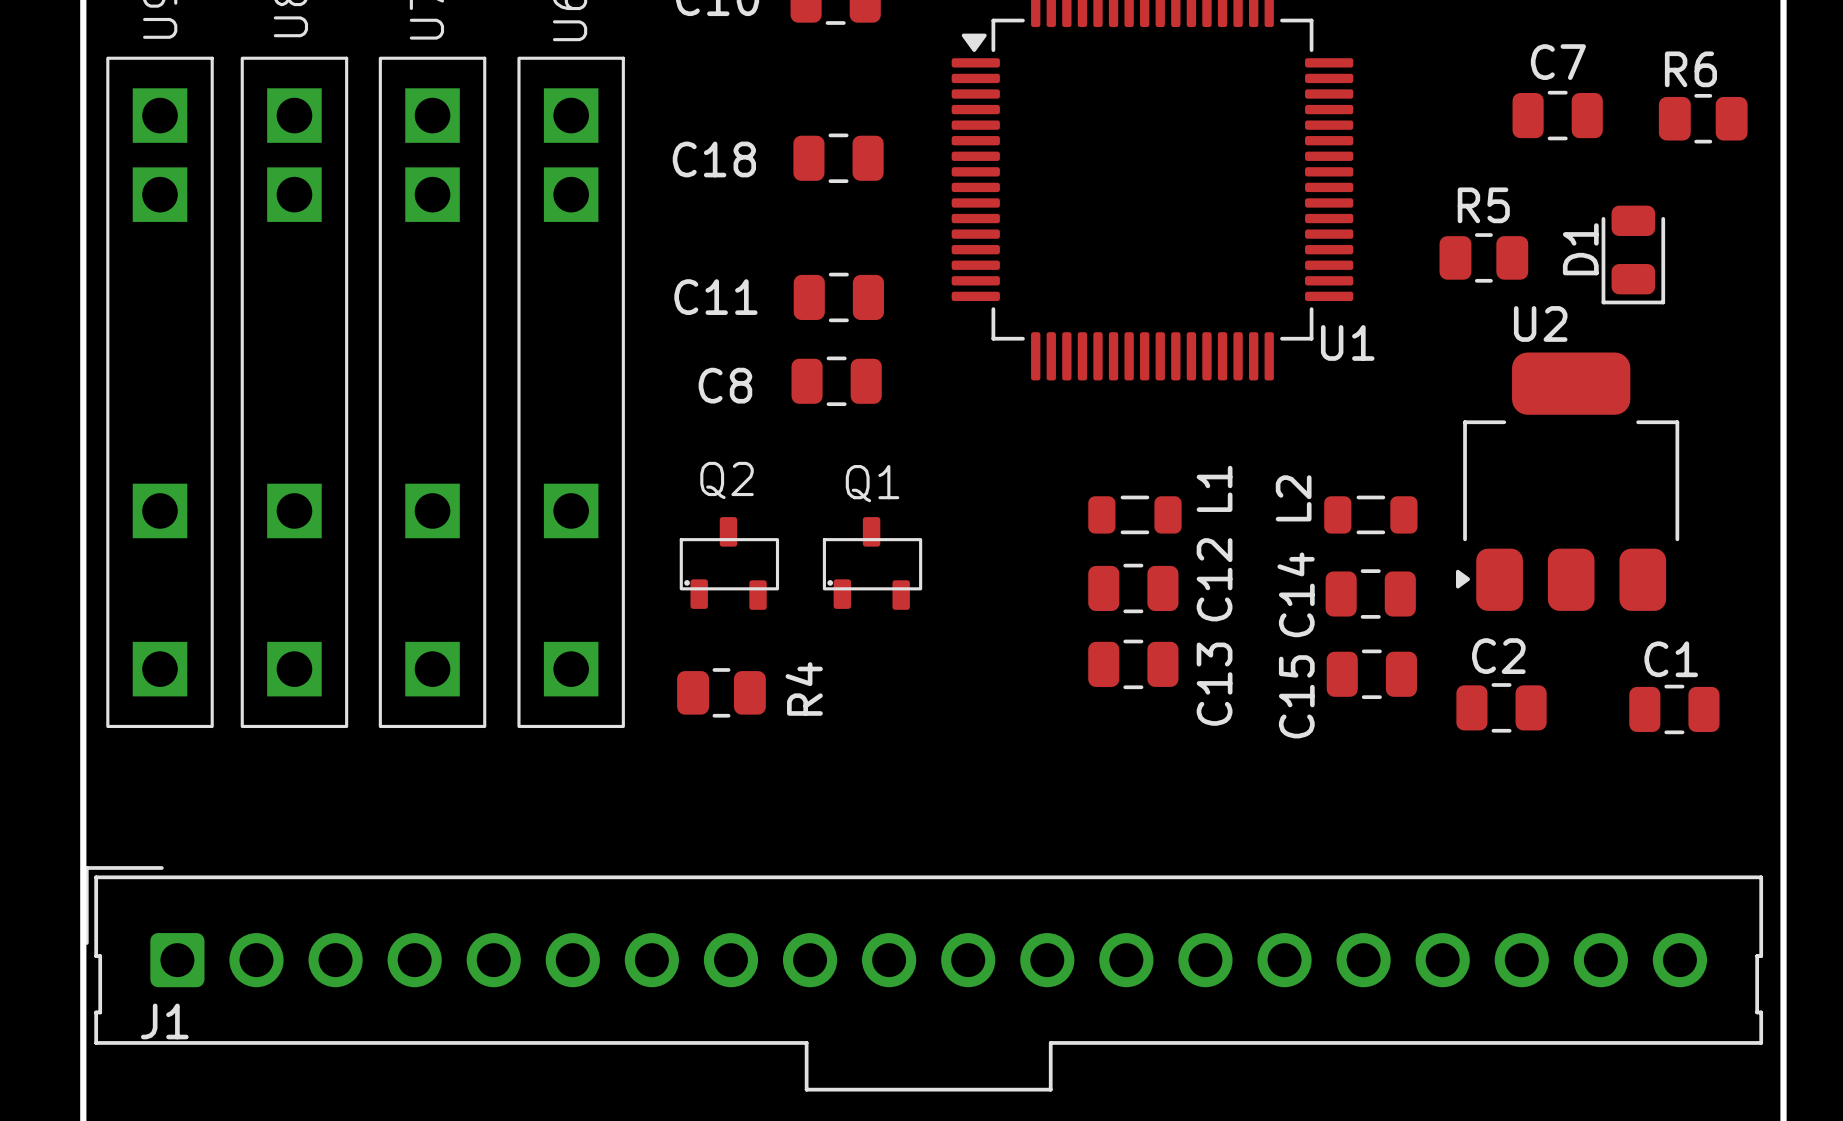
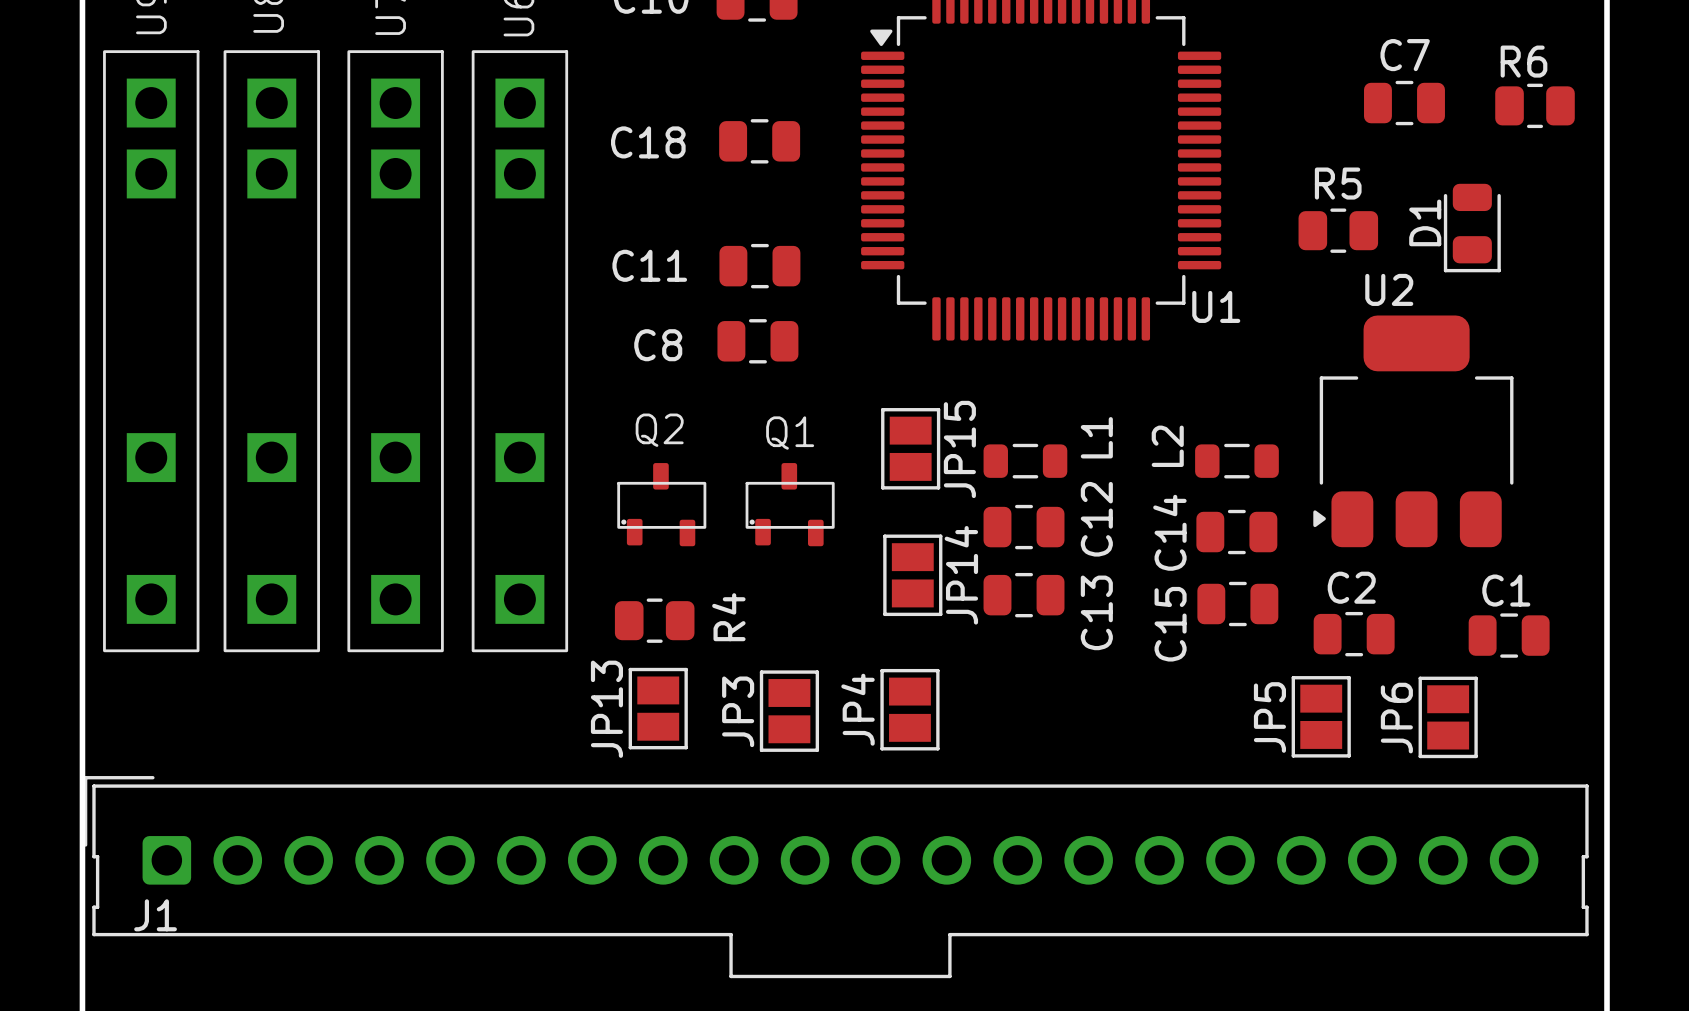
JP15: none -> (910, 448)
JP14: none -> (912, 575)
JP13: none -> (658, 708)
JP4: none -> (909, 709)
JP3: none -> (789, 711)
JP5: none -> (1321, 716)
JP6: none -> (1448, 717)

